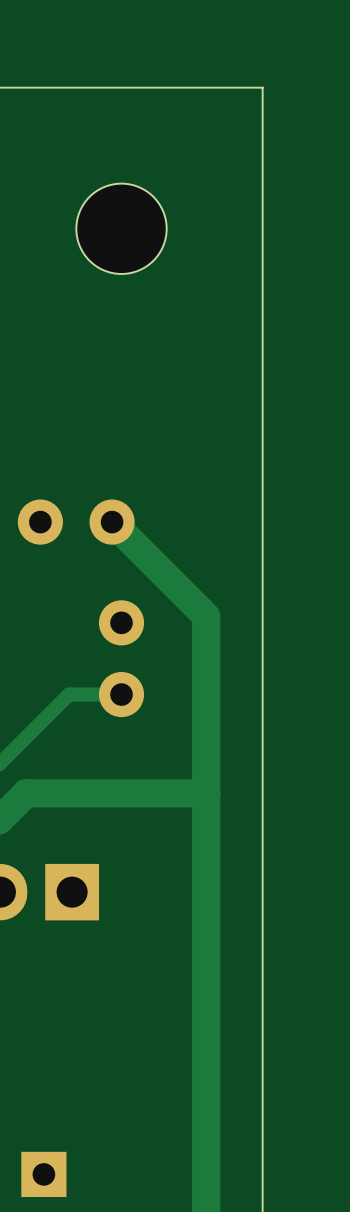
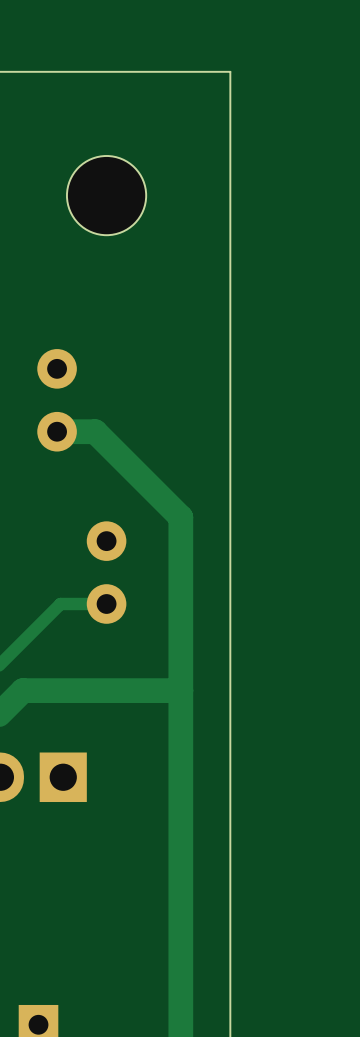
part rotation: 0° (76, 522) -> 90° clockwise (57, 400)
track: (112, 522) (206, 616) -> (57, 431) (95, 431) (180, 517) (180, 535)

